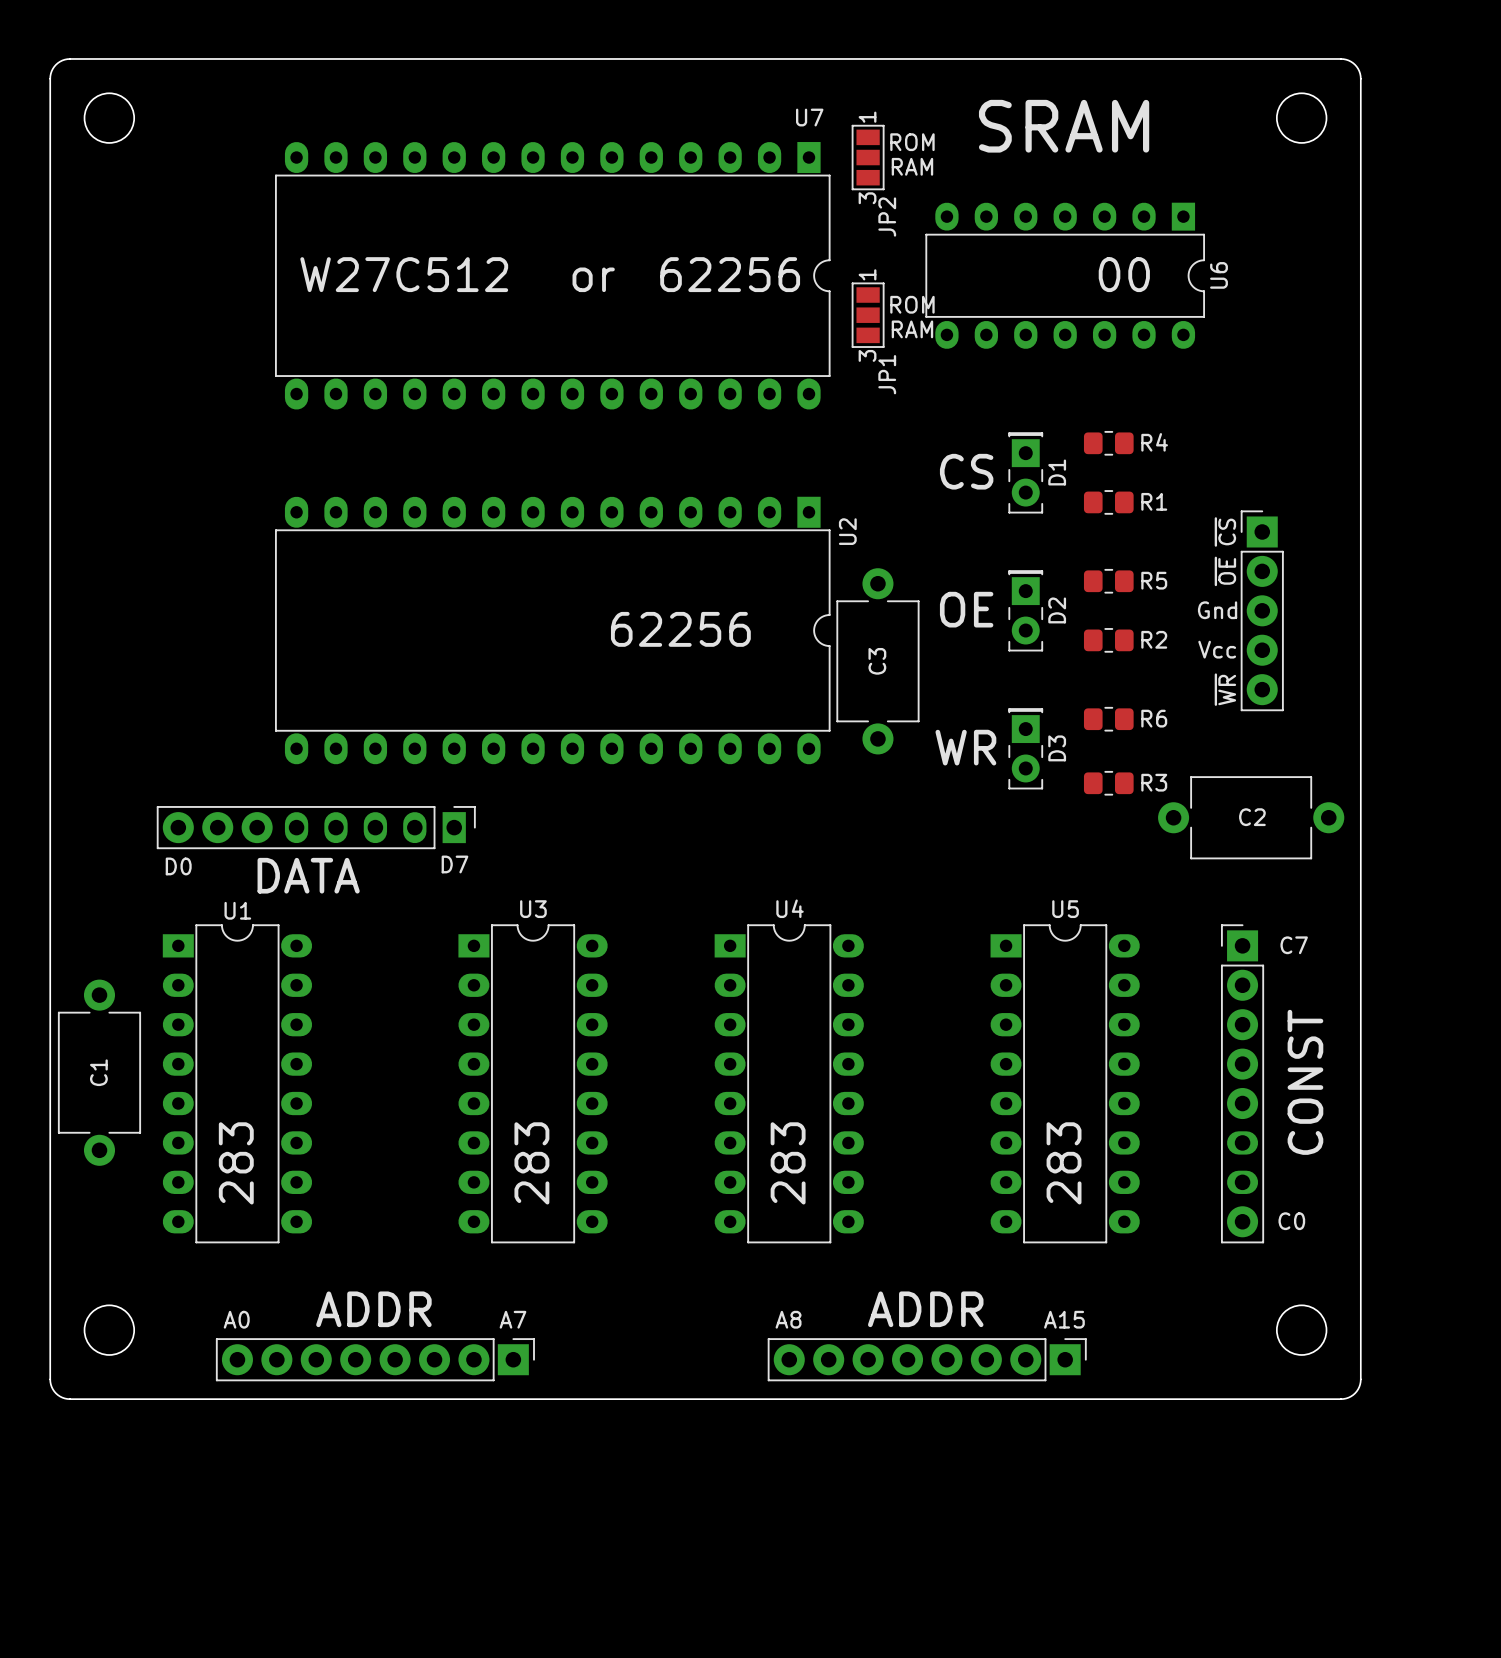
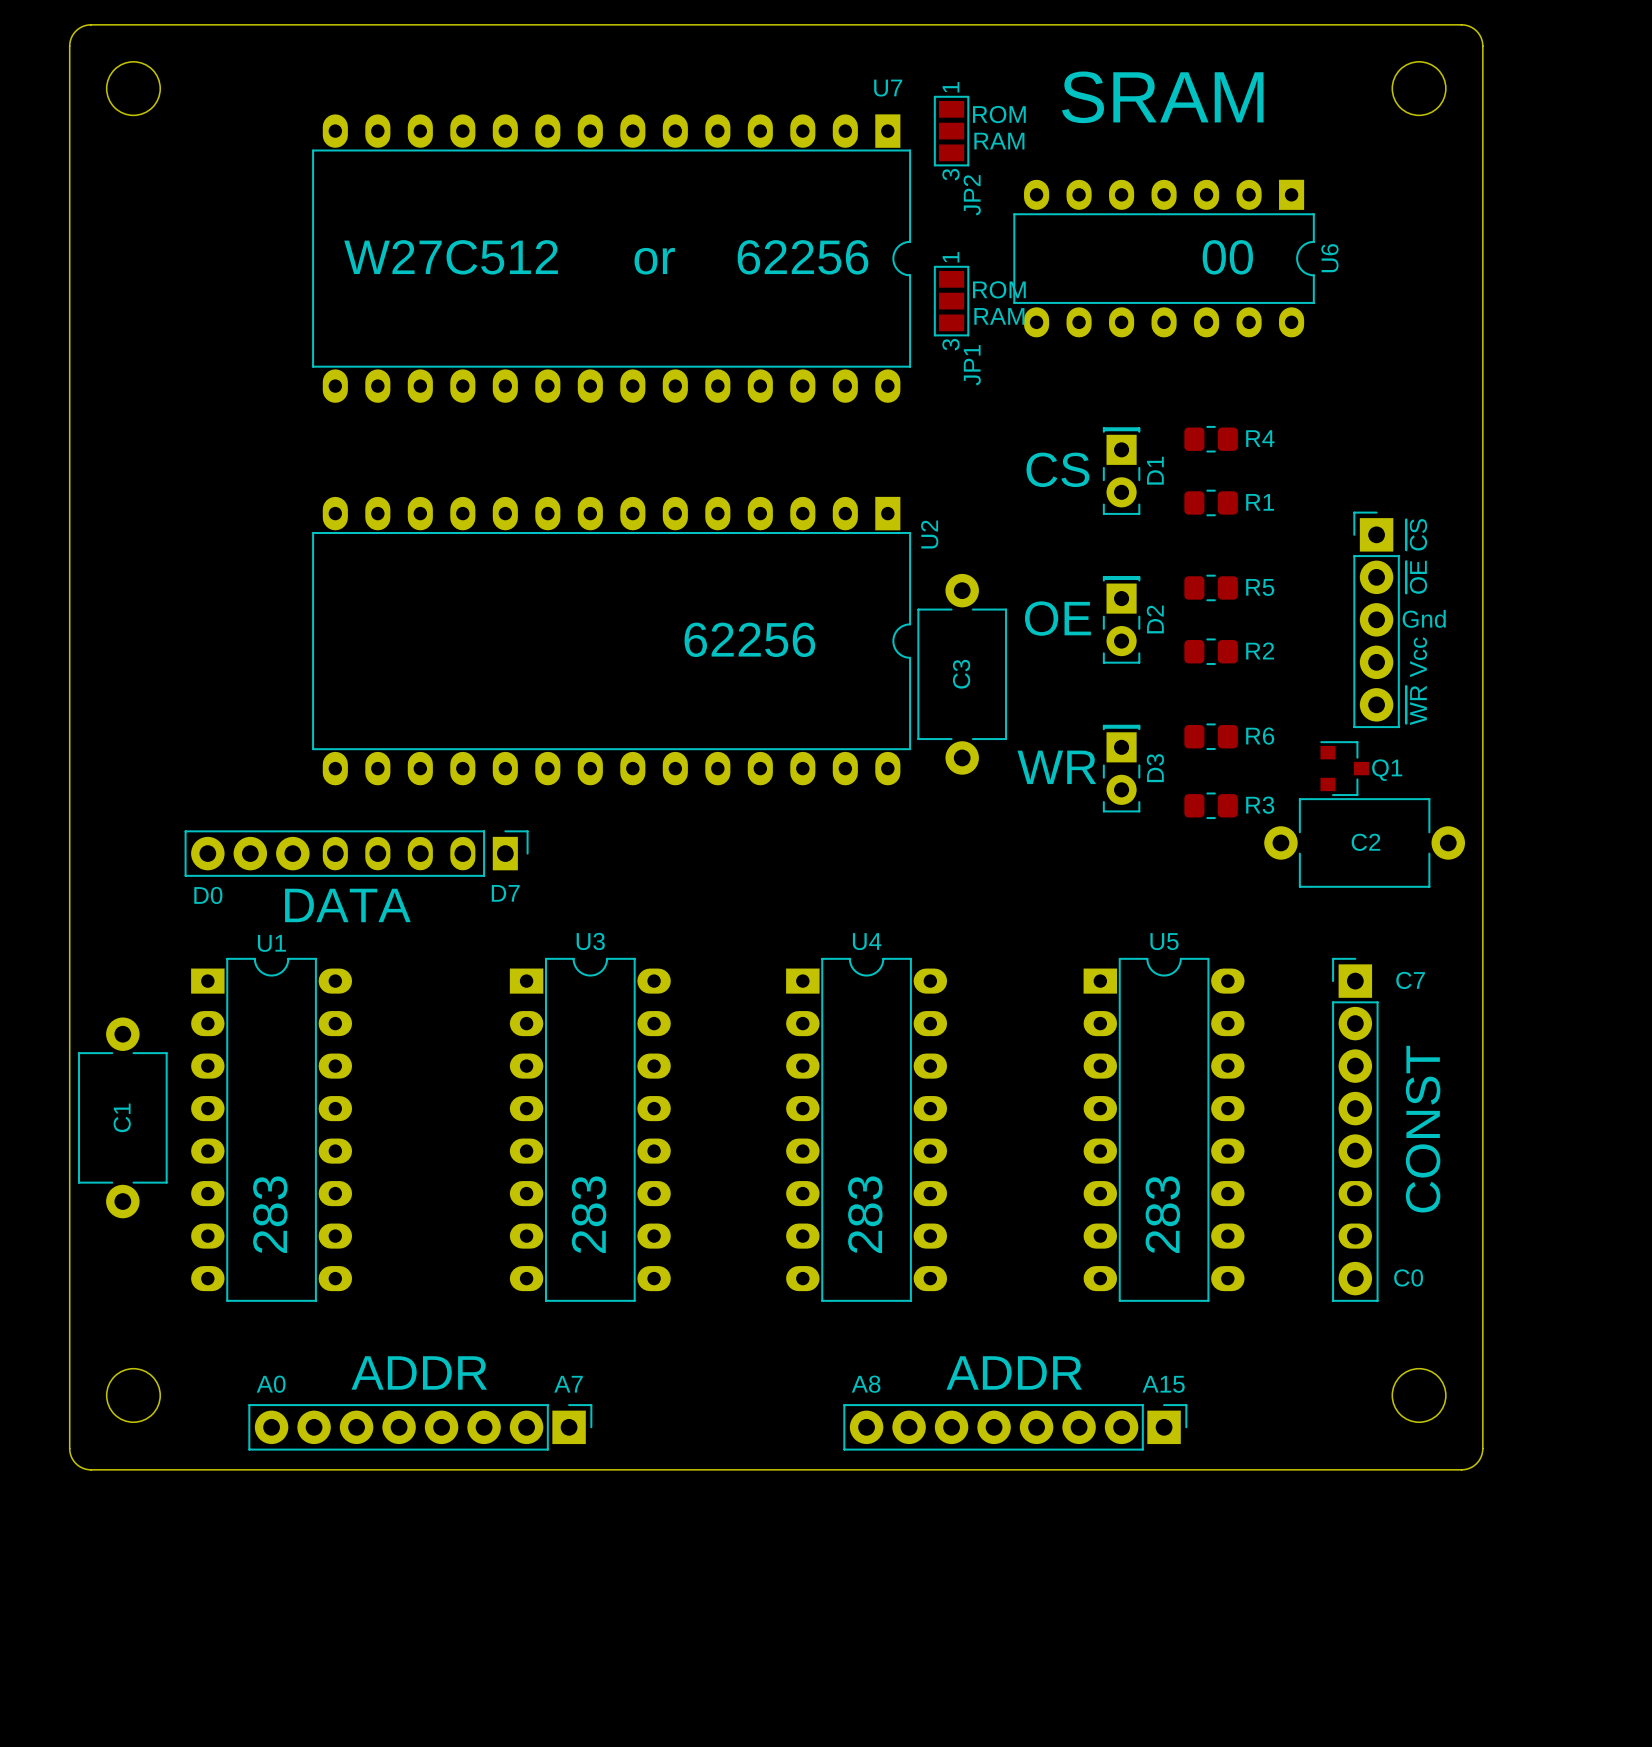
text position: ~{CS} (1225, 531) -> ~{CS} (1416, 534)
text position: ~{OE} (1225, 571) -> ~{OE} (1416, 577)
text position: Gnd (1217, 610) -> Gnd (1424, 618)
text rotation: 0° (1217, 649) -> 90° counterclockwise (1418, 657)
text position: Vcc (1217, 649) -> Vcc (1418, 657)
text position: ~{WR} (1225, 689) -> ~{WR} (1416, 705)
Q1: none -> (1344, 768)

